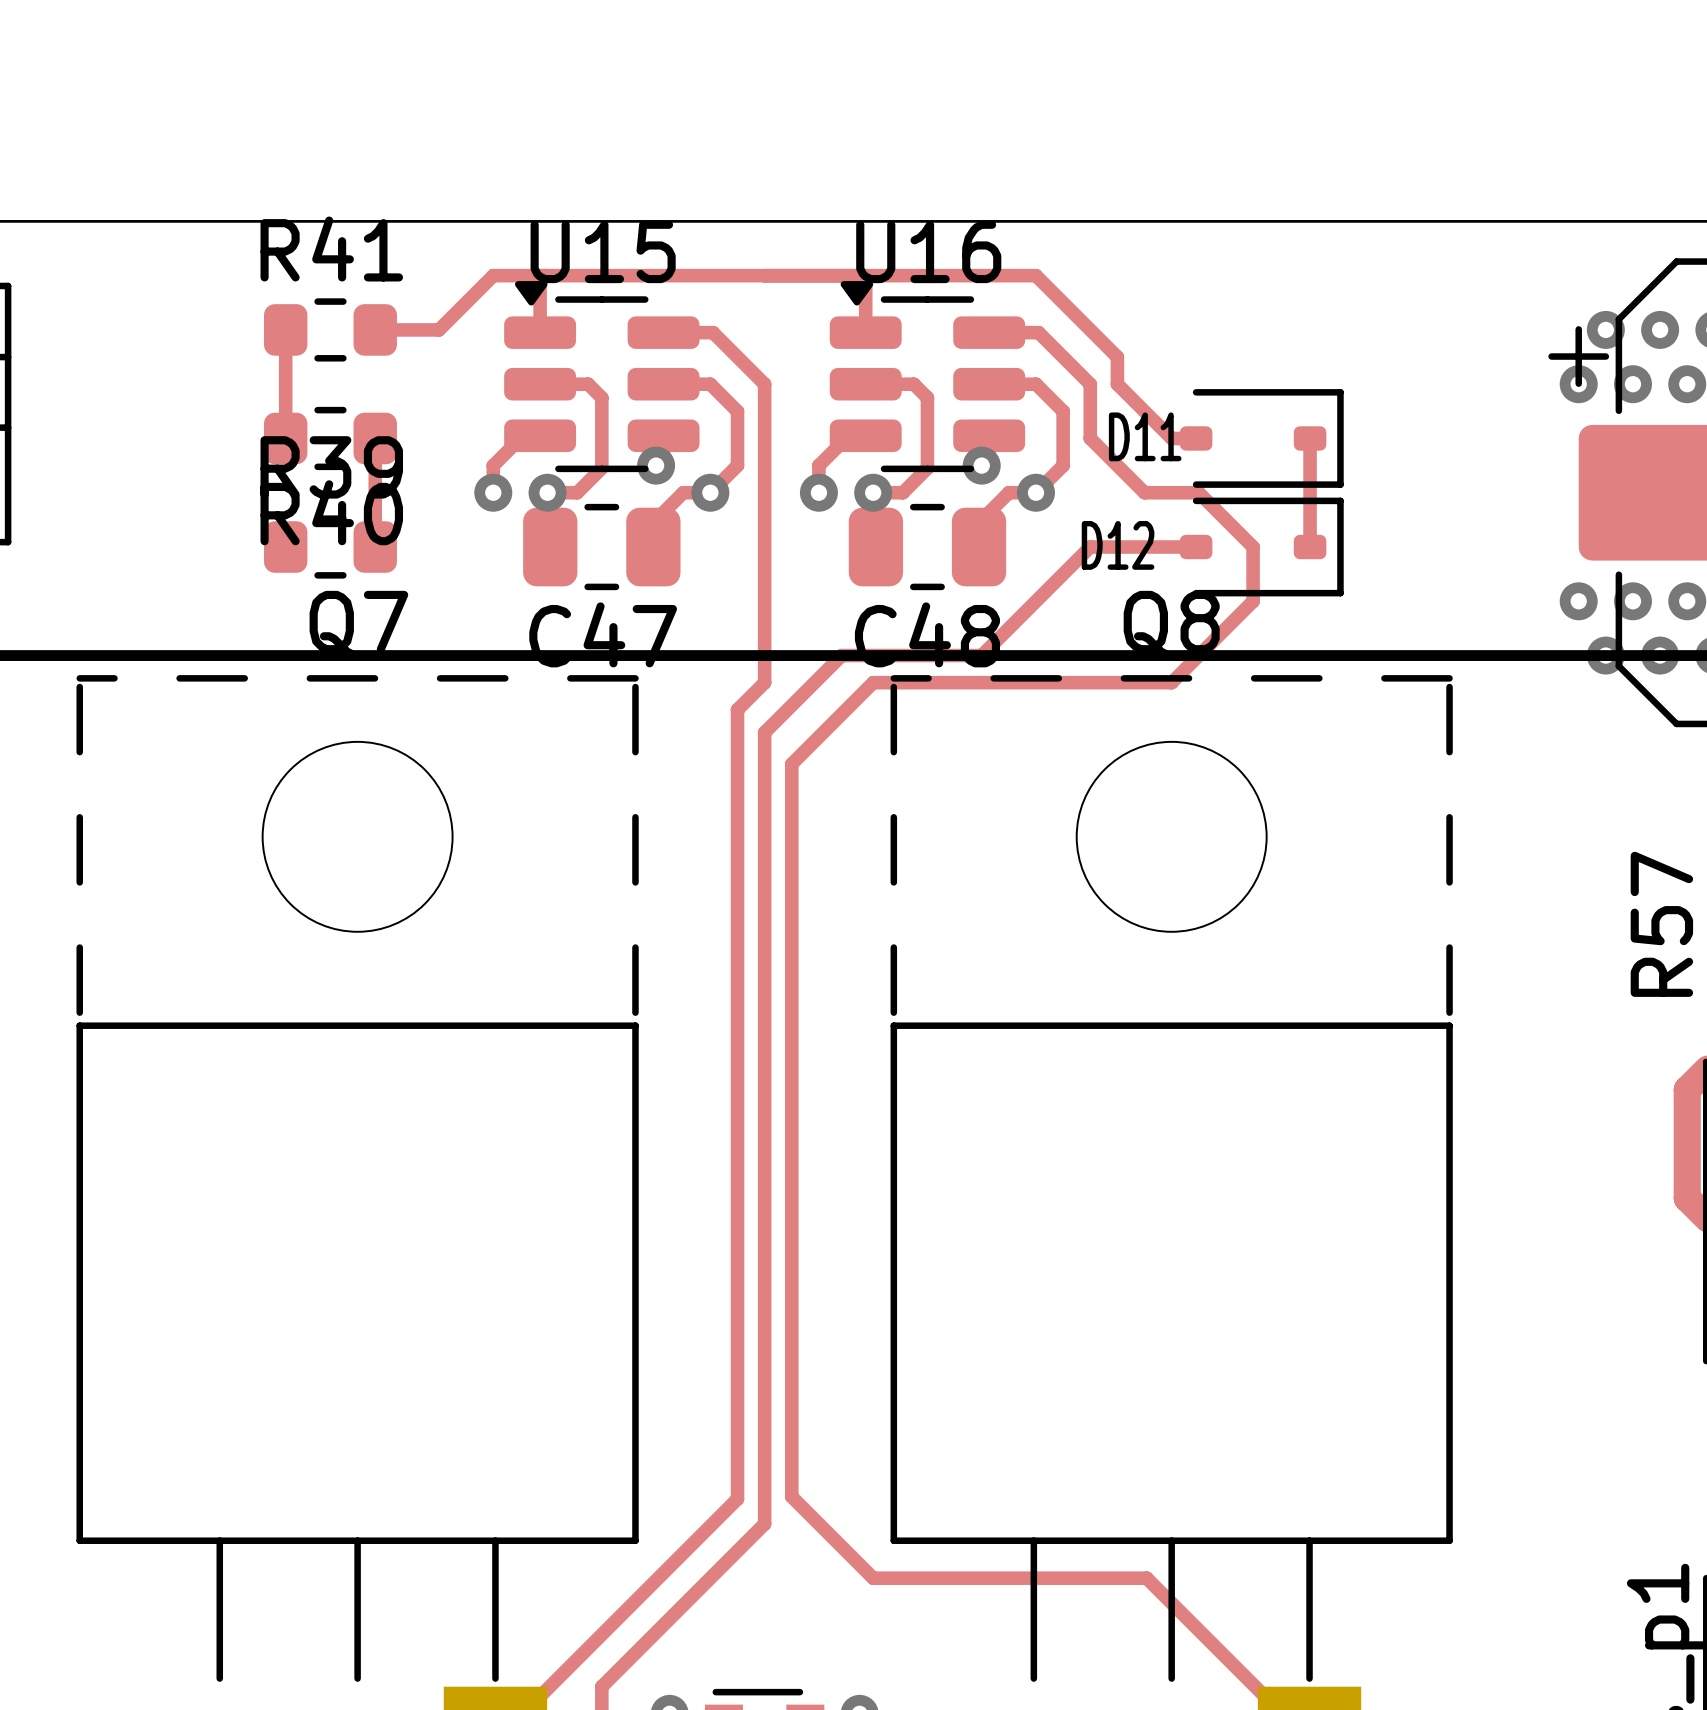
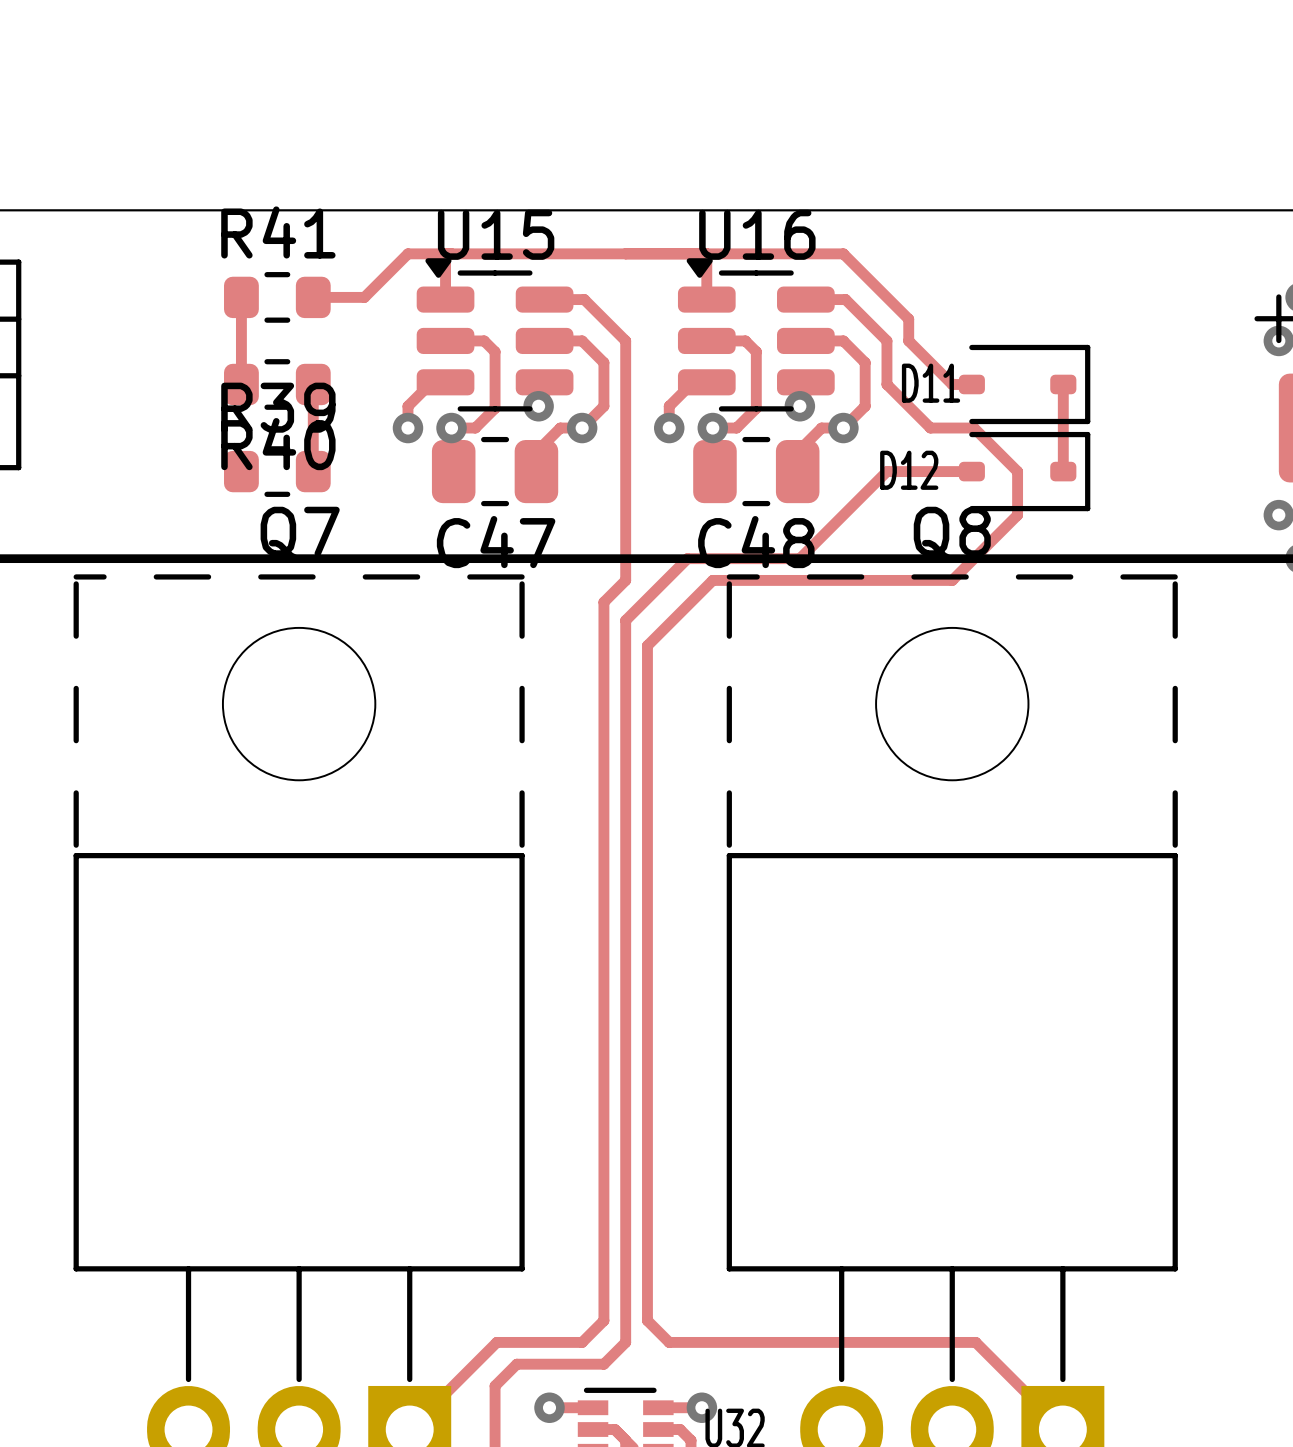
track: (791, 1496) (873, 1578) (1146, 1578) (1200, 1632) -> (647, 1233) (647, 1320) (669, 1342) (975, 1342)
track: (737, 1498) (604, 1632) -> (603, 1235) (603, 1320) (582, 1342) (496, 1342)
track: (764, 1523) (628, 1659) -> (625, 1255) (625, 1342) (603, 1364) (516, 1364)

